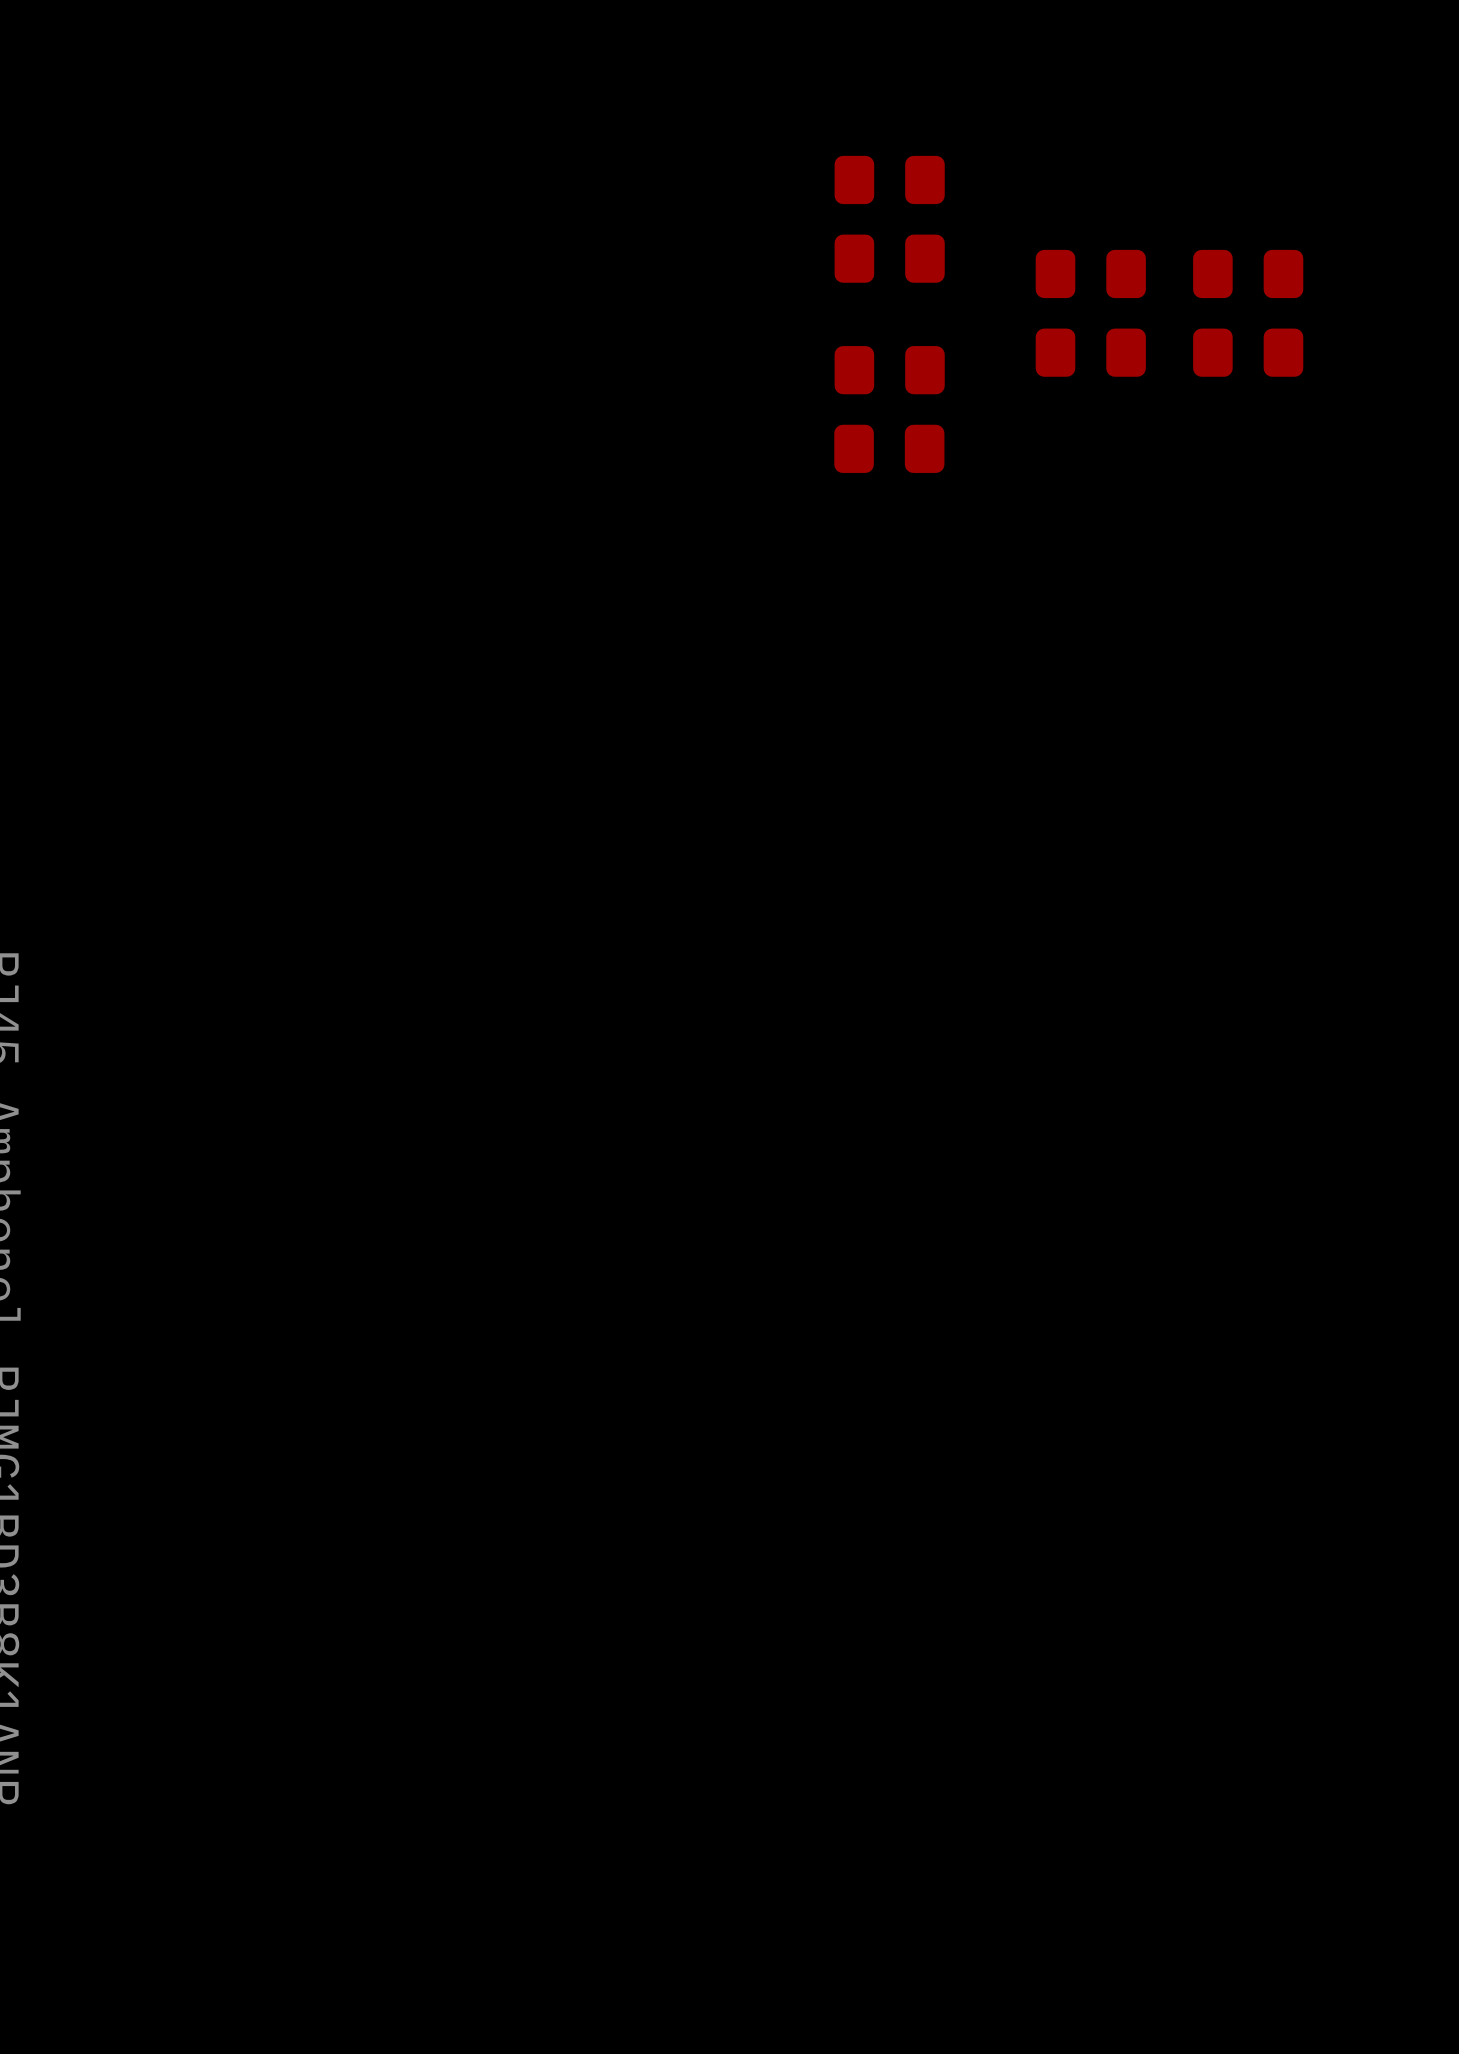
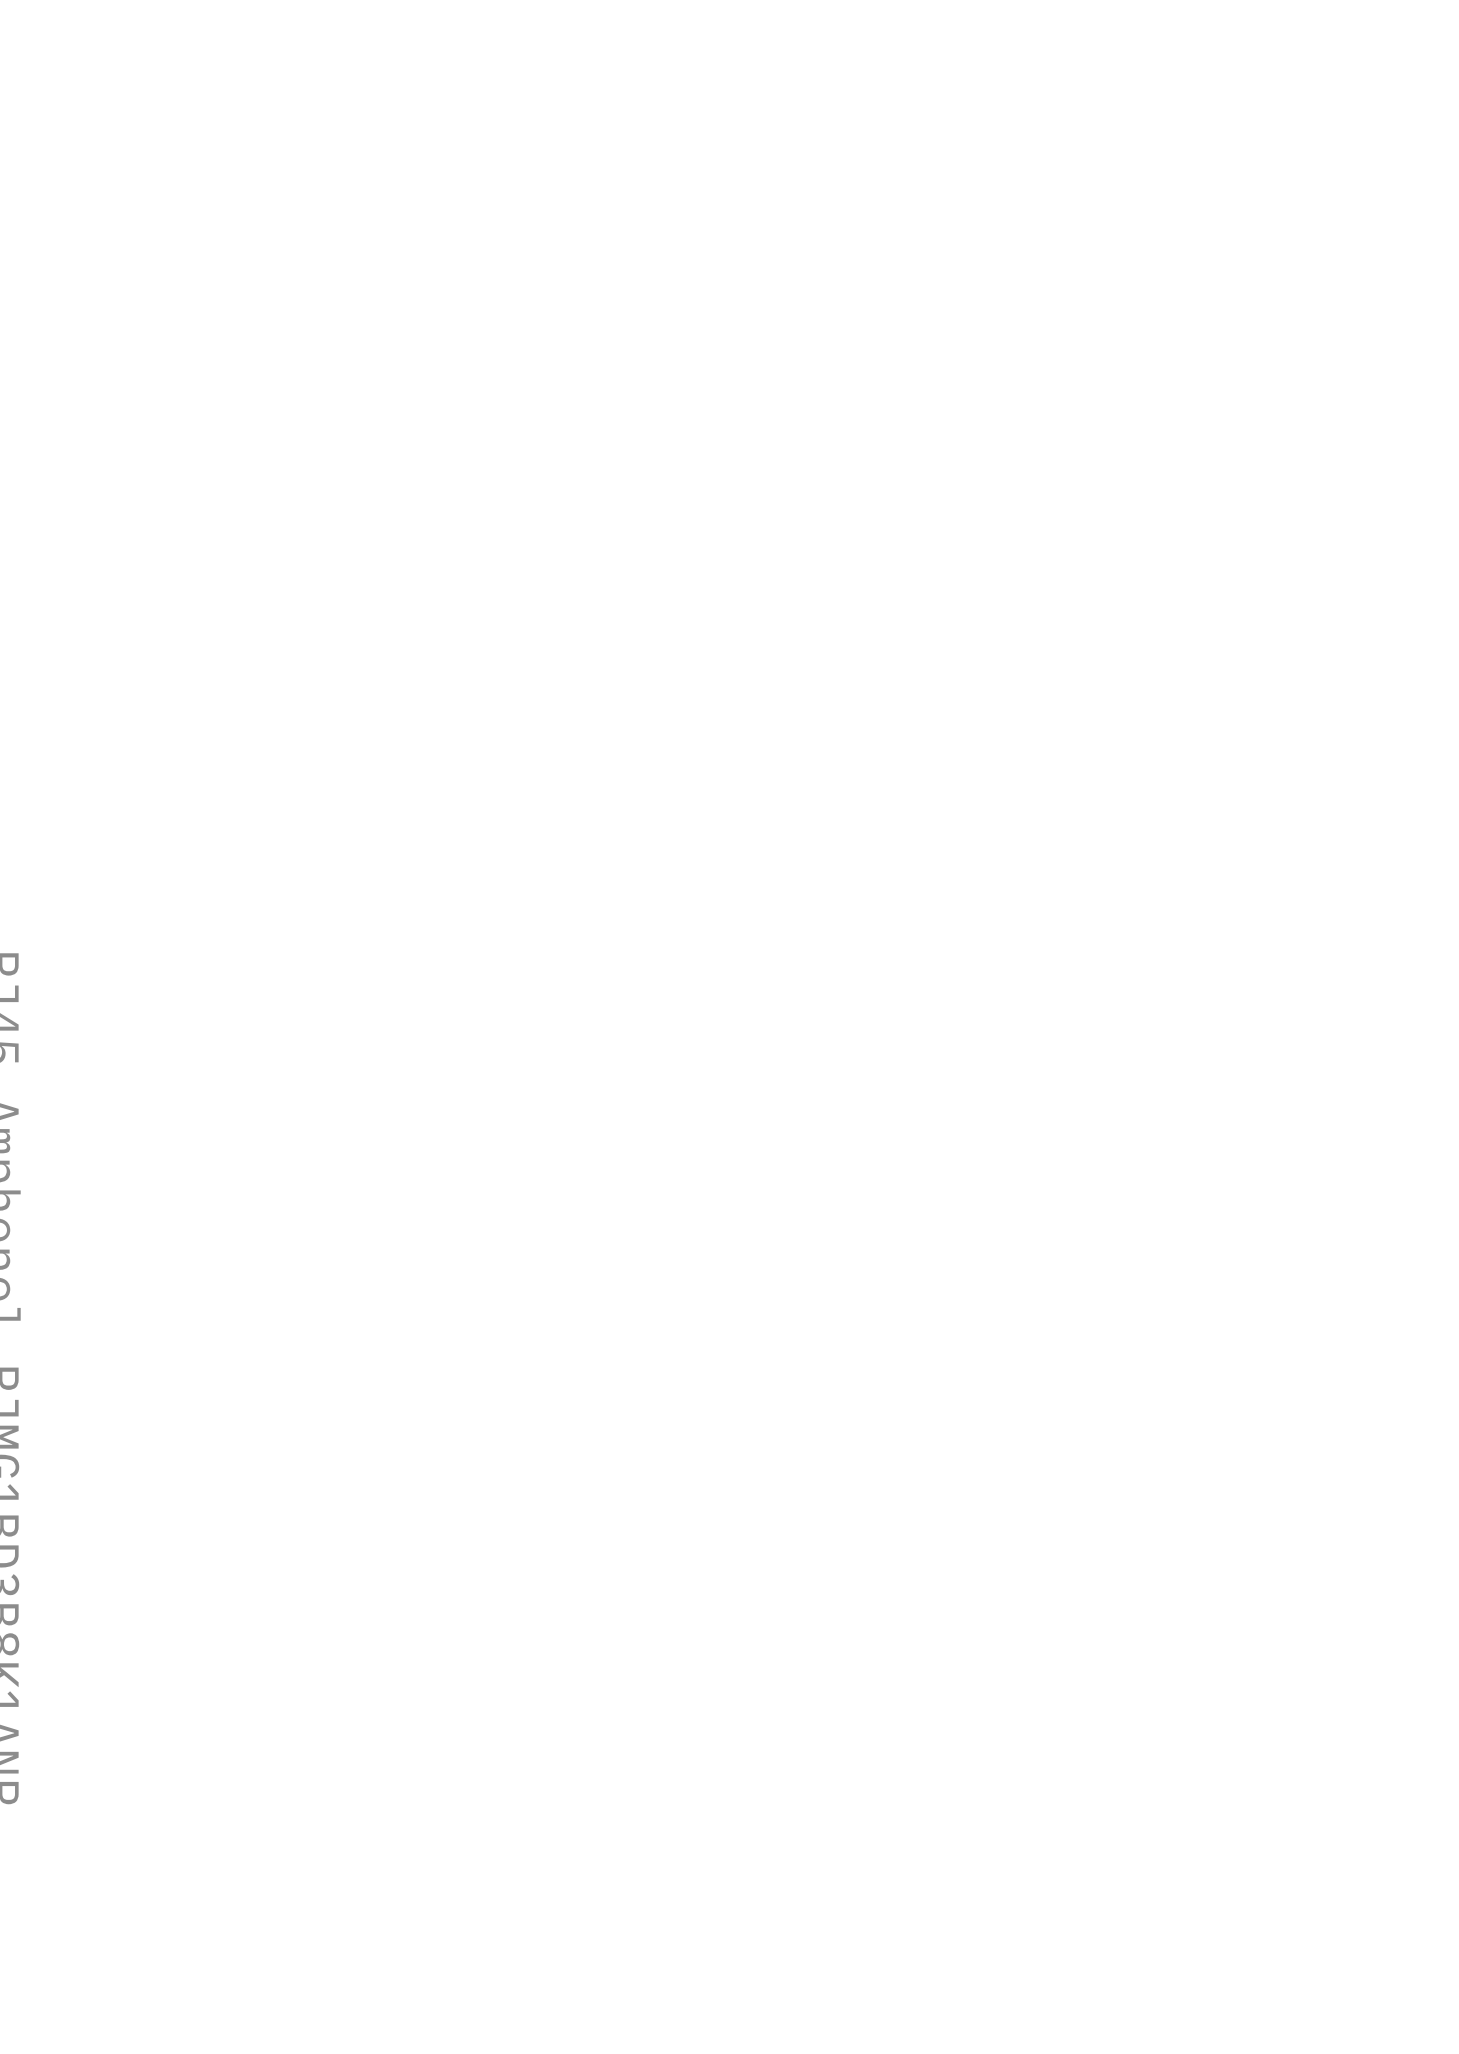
part: (889, 179) -> none
part: (889, 258) -> none
part: (1090, 273) -> none
part: (1248, 273) -> none
part: (1090, 352) -> none
part: (1248, 352) -> none
part: (889, 370) -> none
part: (889, 448) -> none

